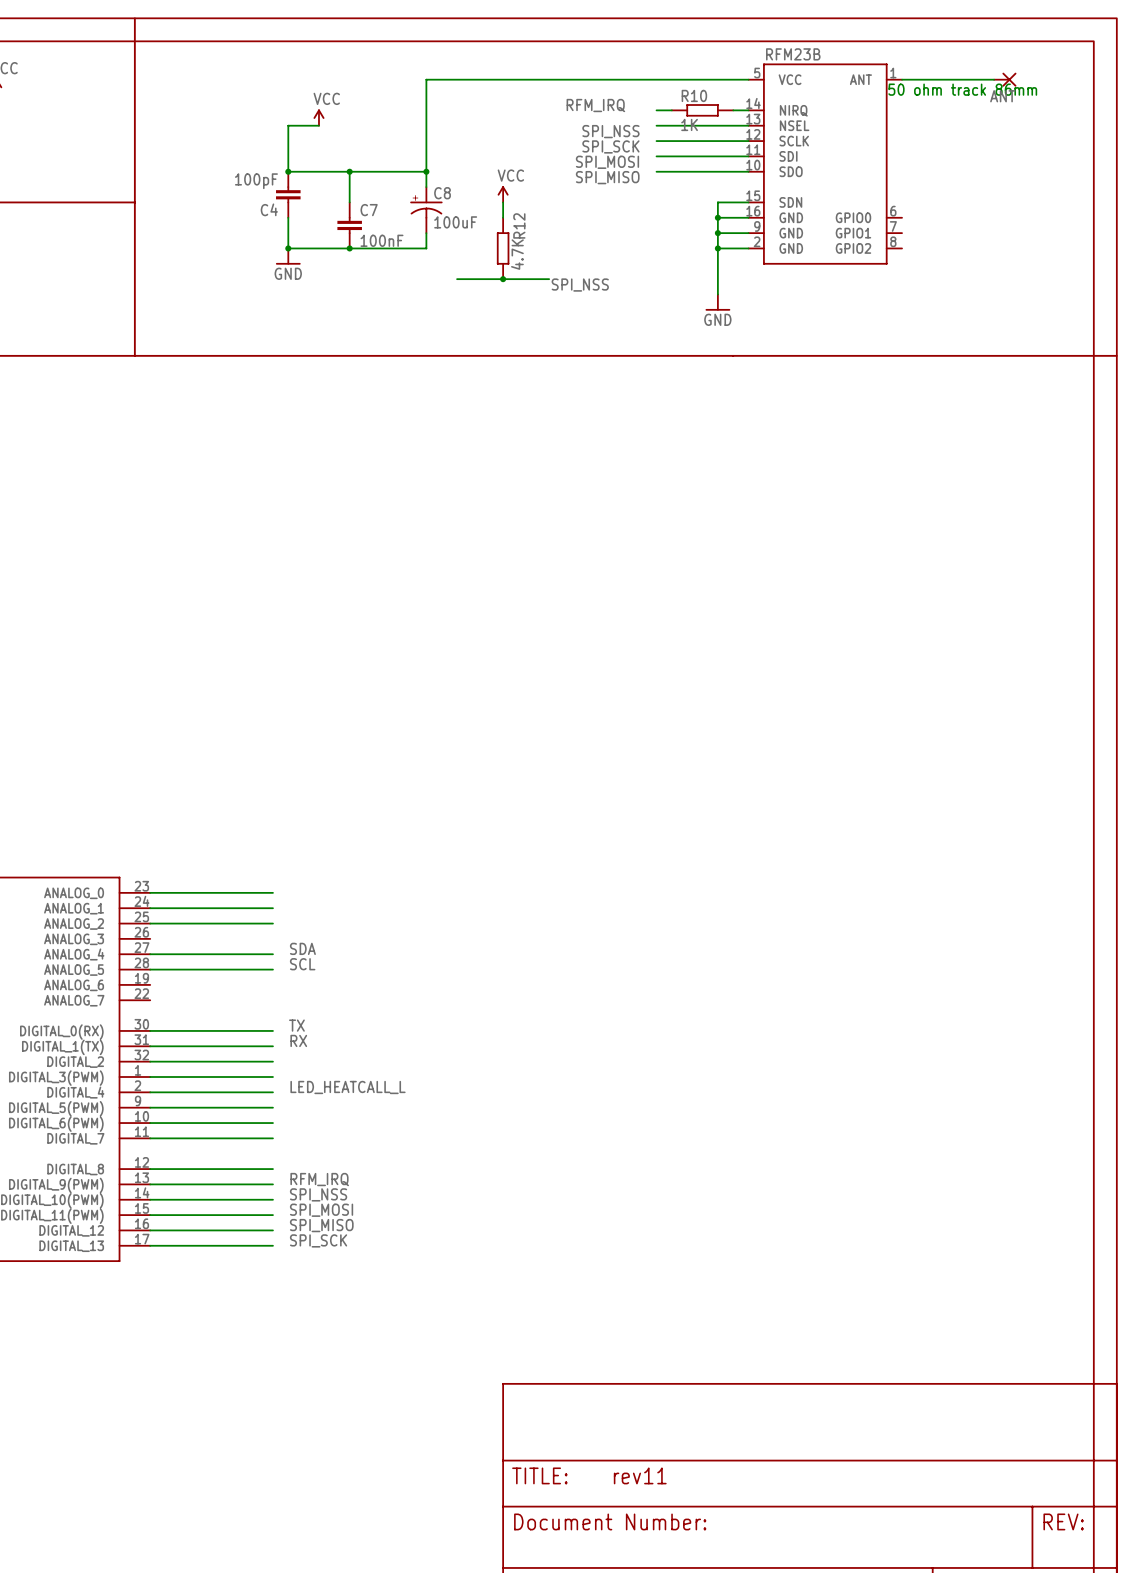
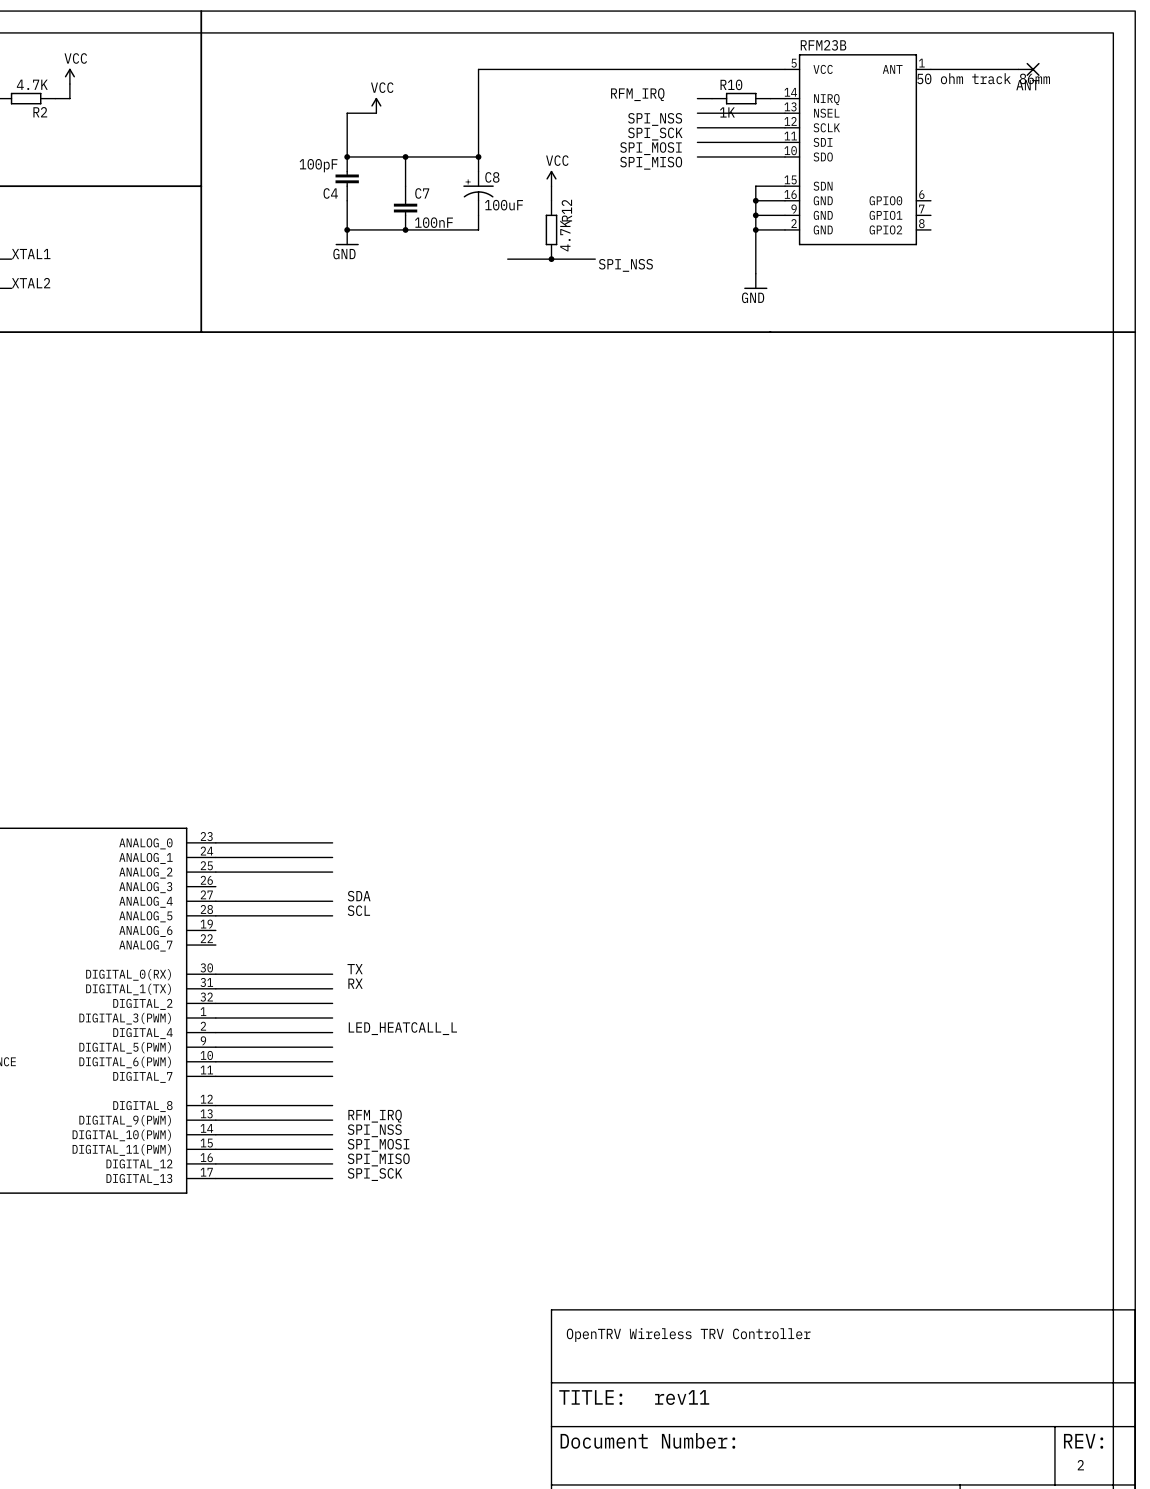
text: none -> OpenTRV Wireless TRV Controller (688, 1335)
text: none -> 2 (1080, 1465)

